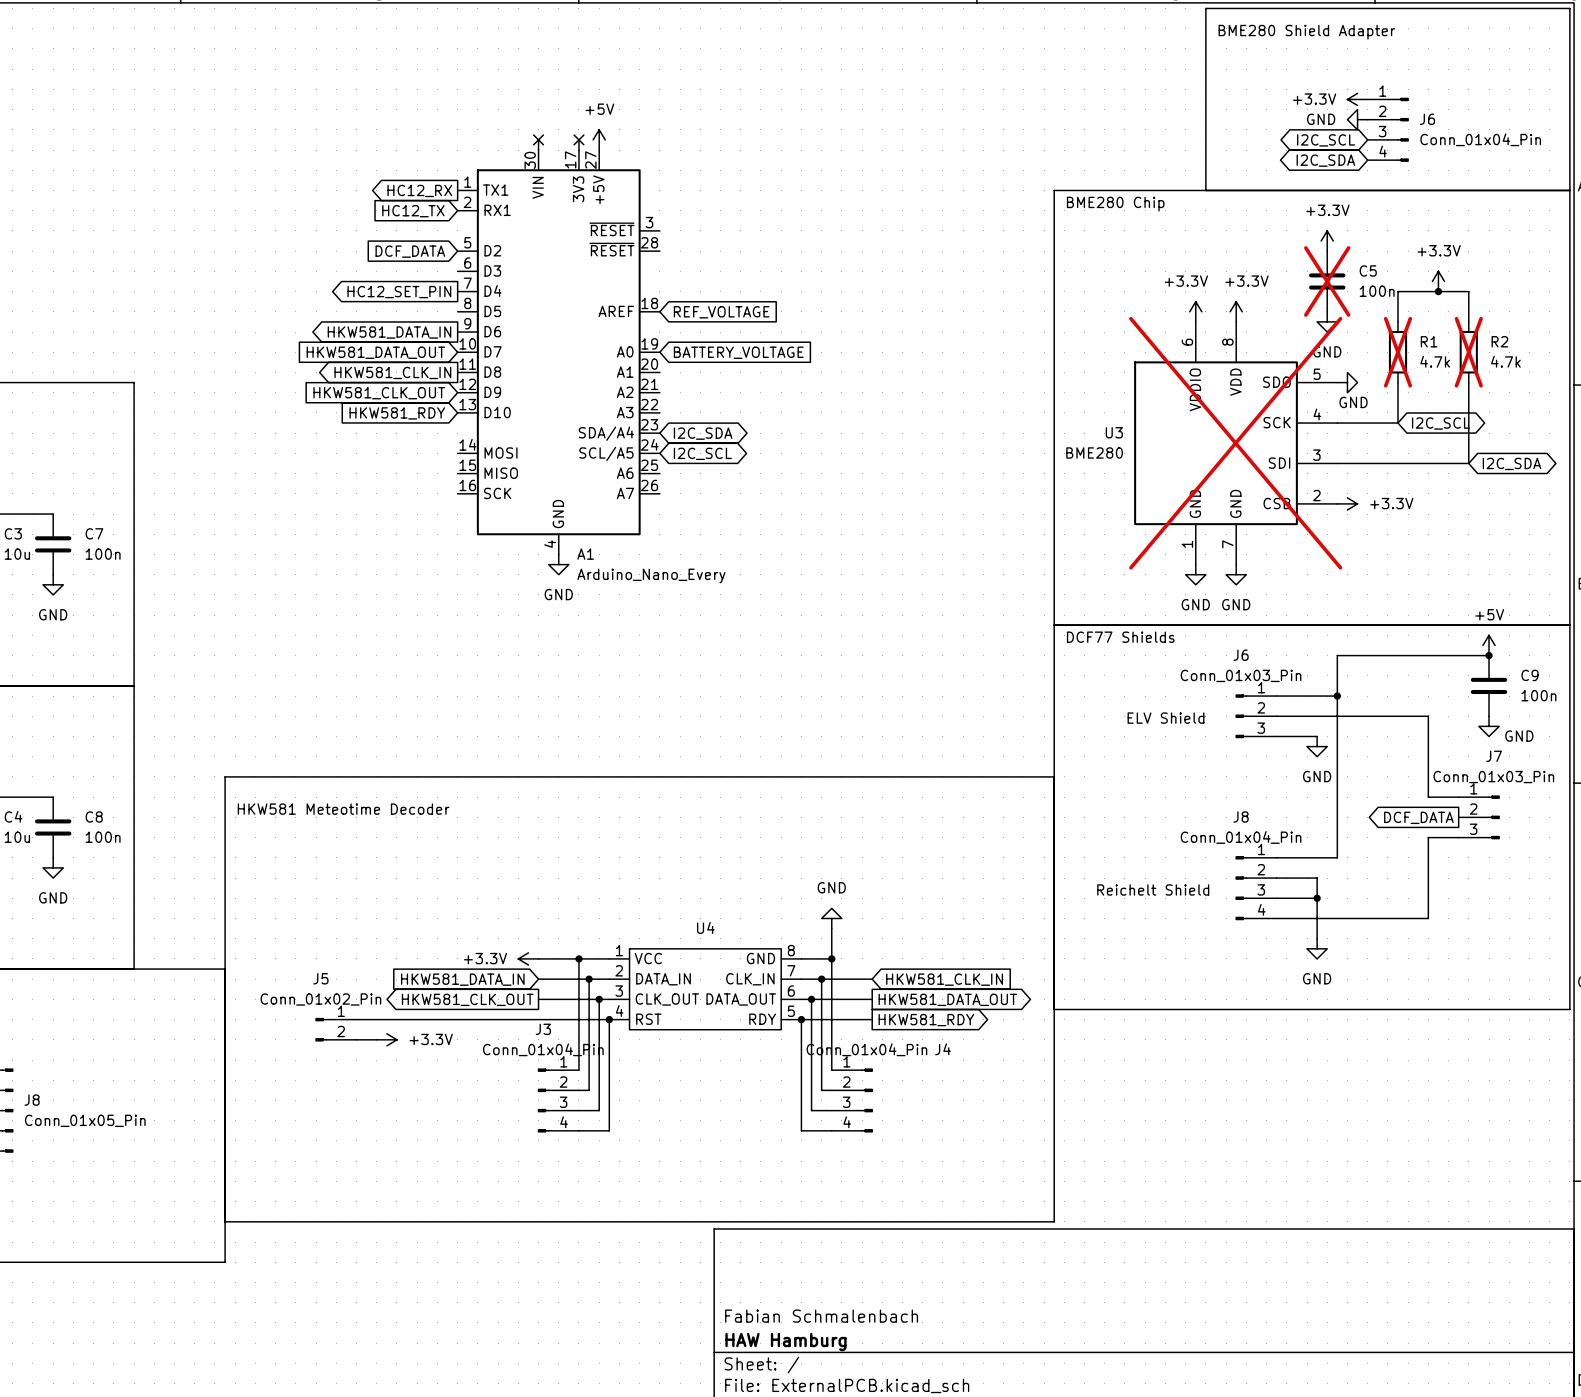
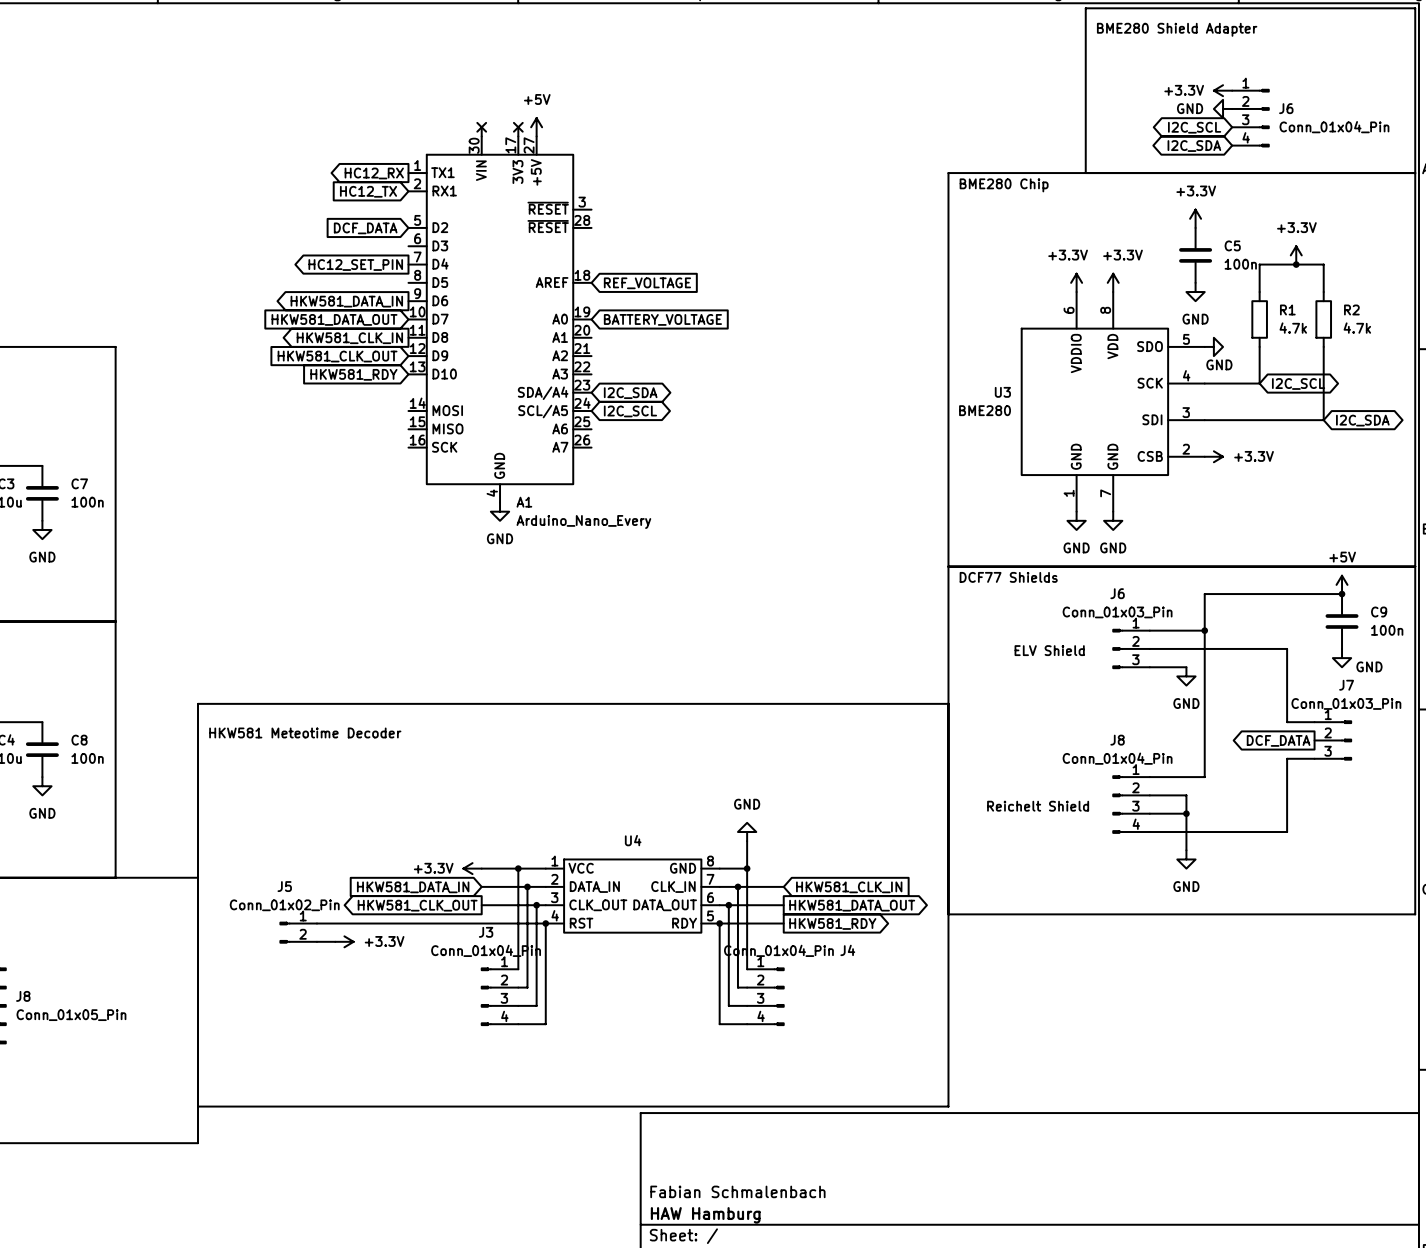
C5 do-not-place cross: (1327, 281) -> none
R1 do-not-place cross: (1398, 352) -> none
R2 do-not-place cross: (1468, 352) -> none
U3 do-not-place cross: (1235, 443) -> none

